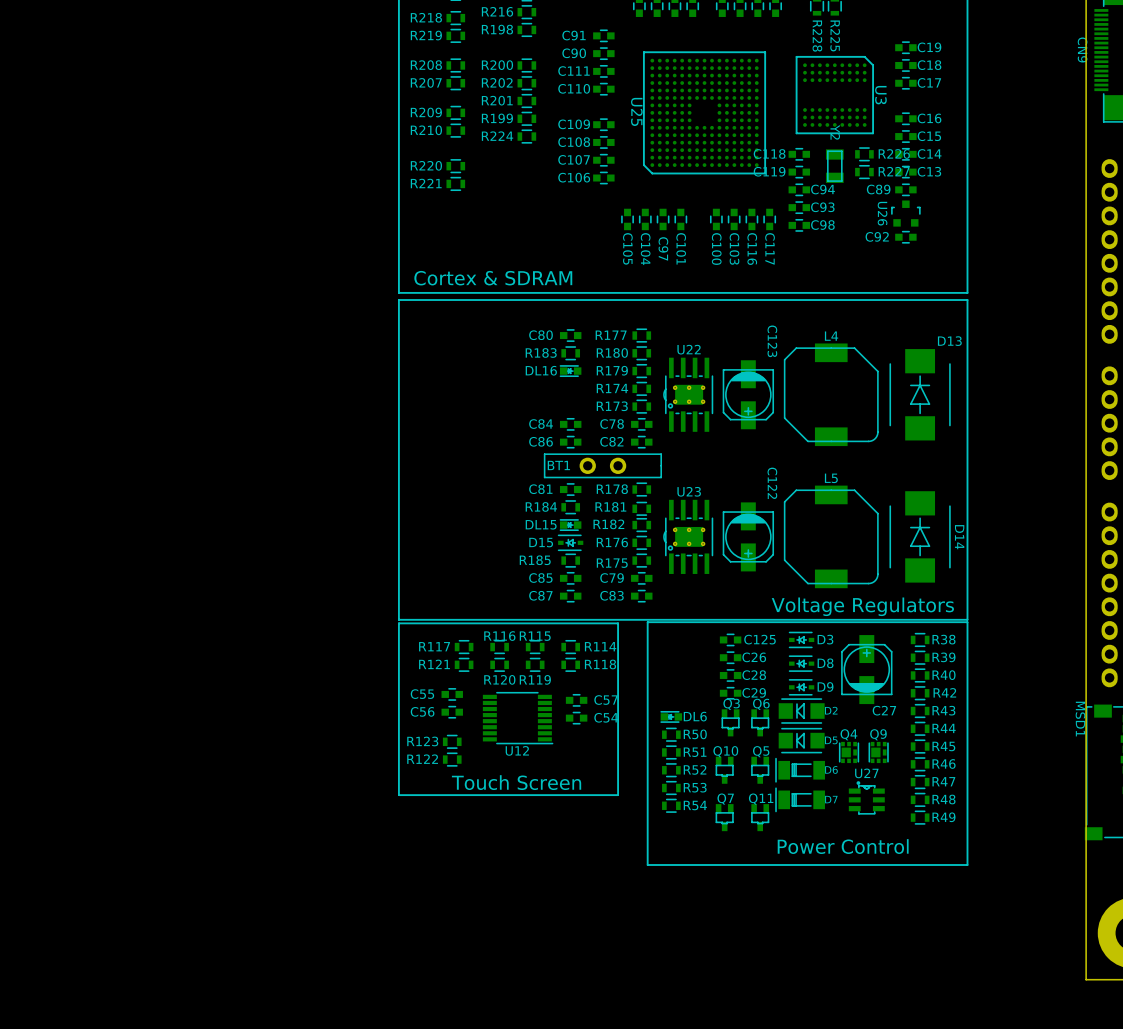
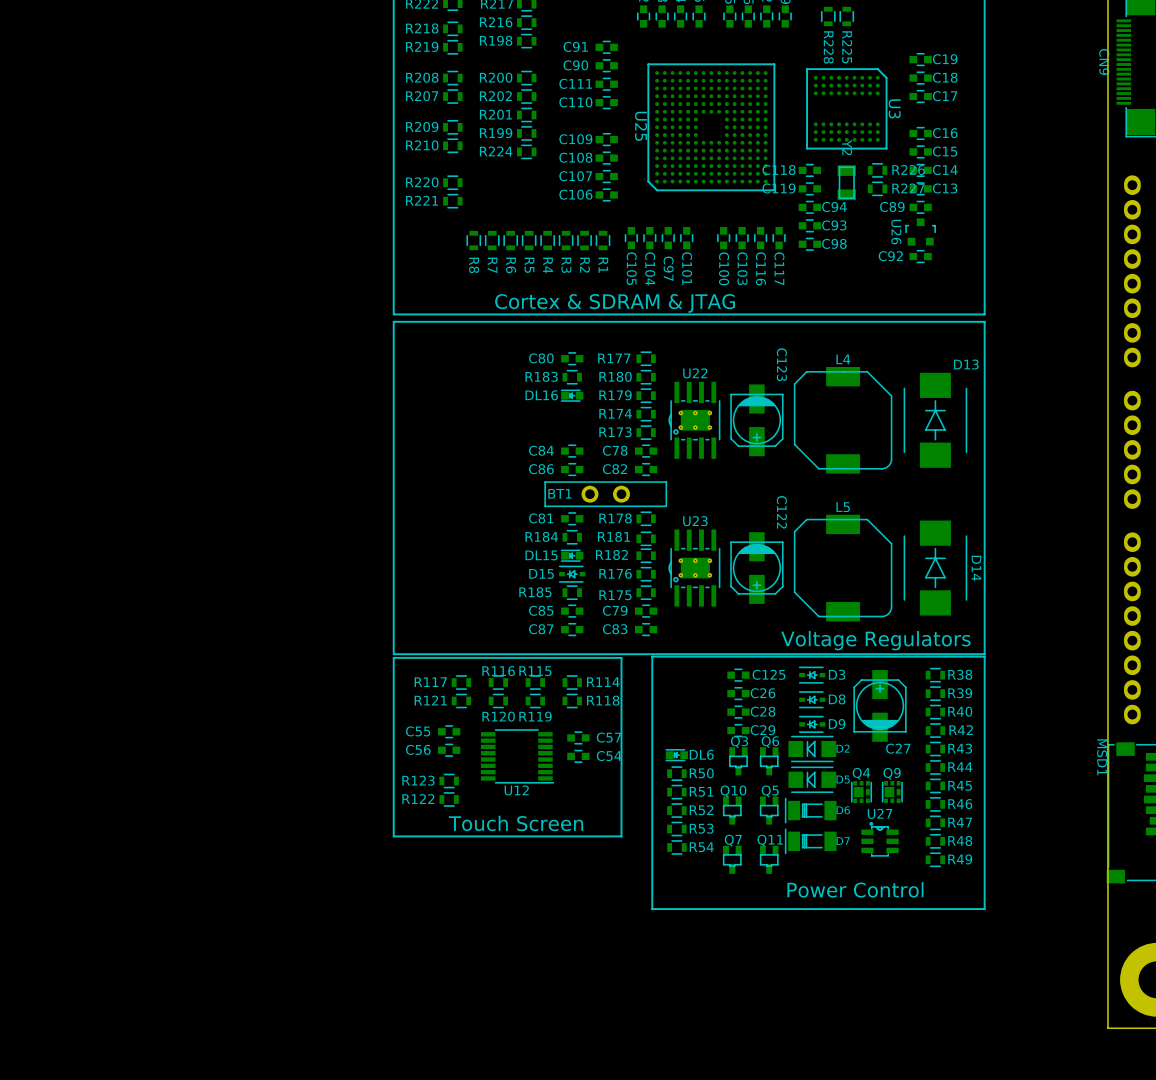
R8: none -> (473, 240)
R7: none -> (492, 240)
R6: none -> (510, 240)
R5: none -> (529, 240)
R4: none -> (547, 240)
R3: none -> (566, 240)
R2: none -> (584, 240)
R1: none -> (603, 240)
text: Cortex & SDRAM (493, 278) -> Cortex & SDRAM & JTAG (615, 303)

